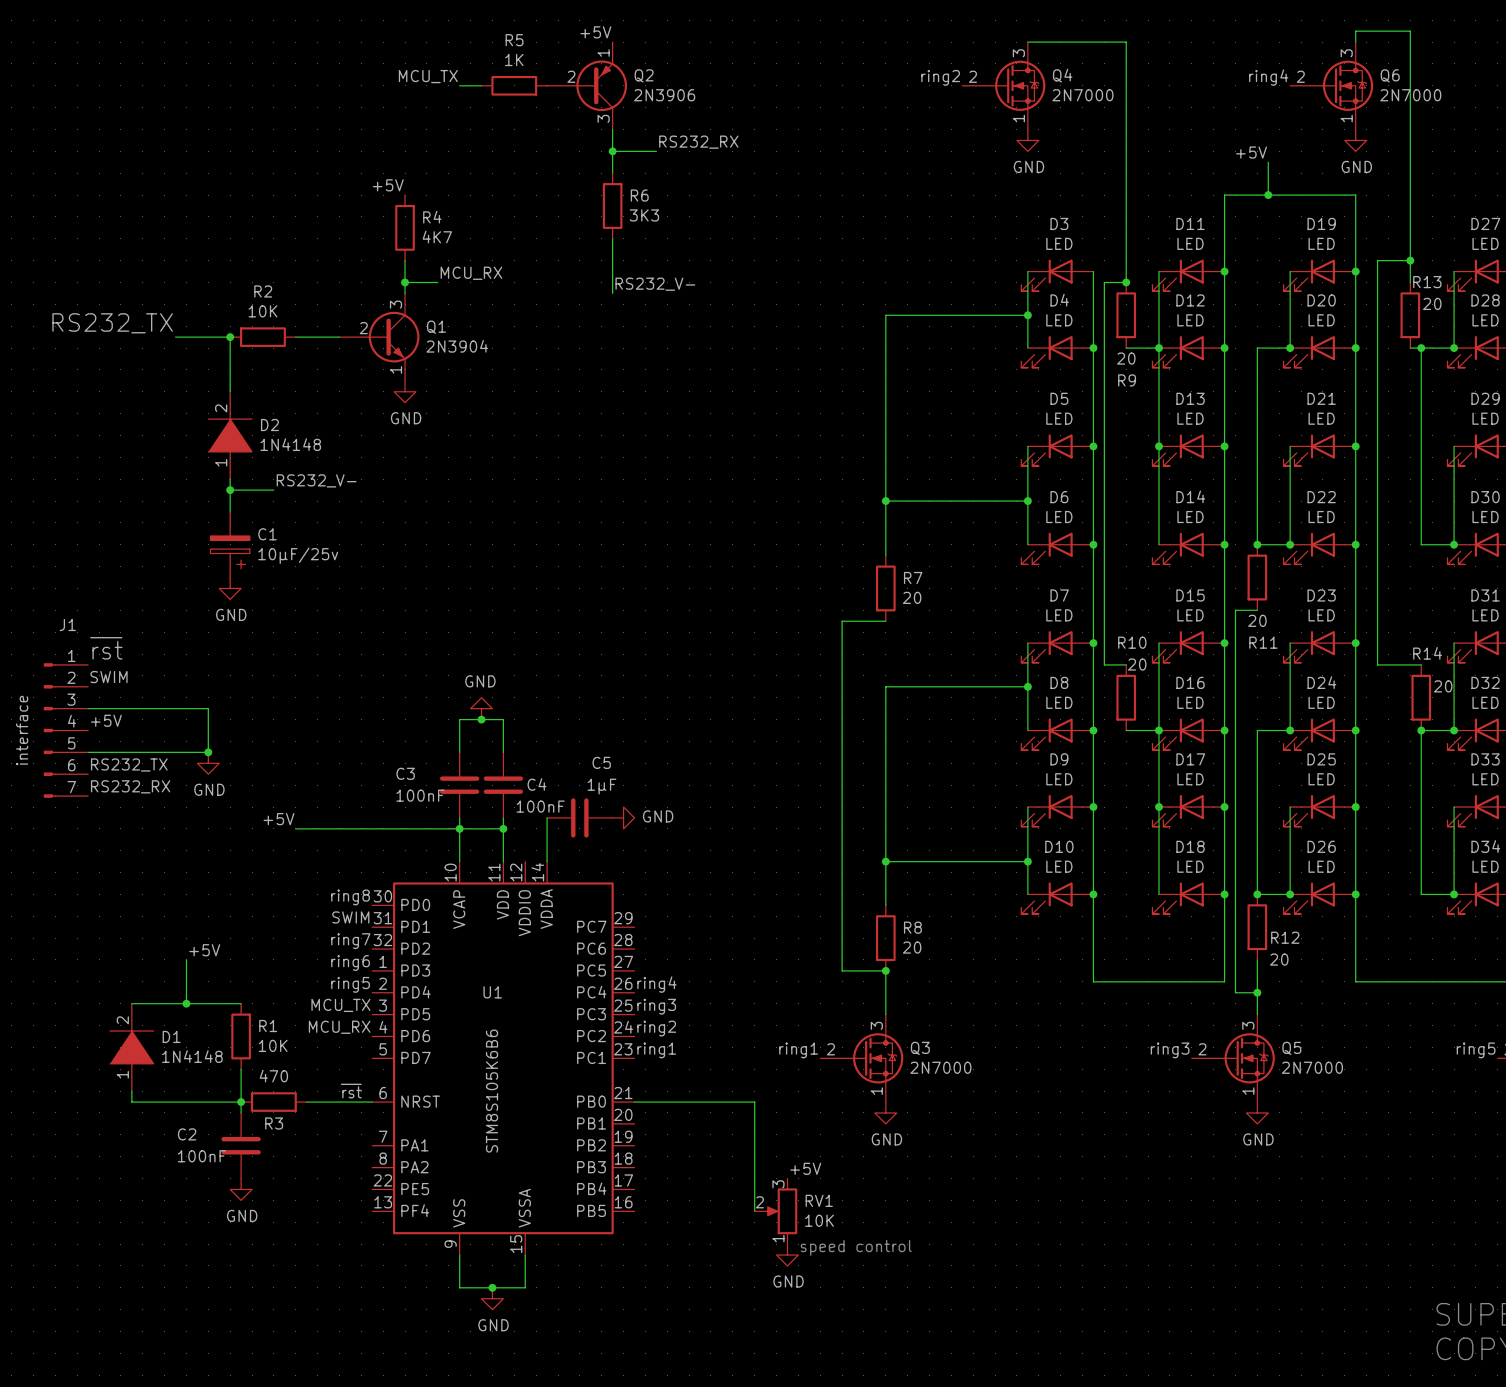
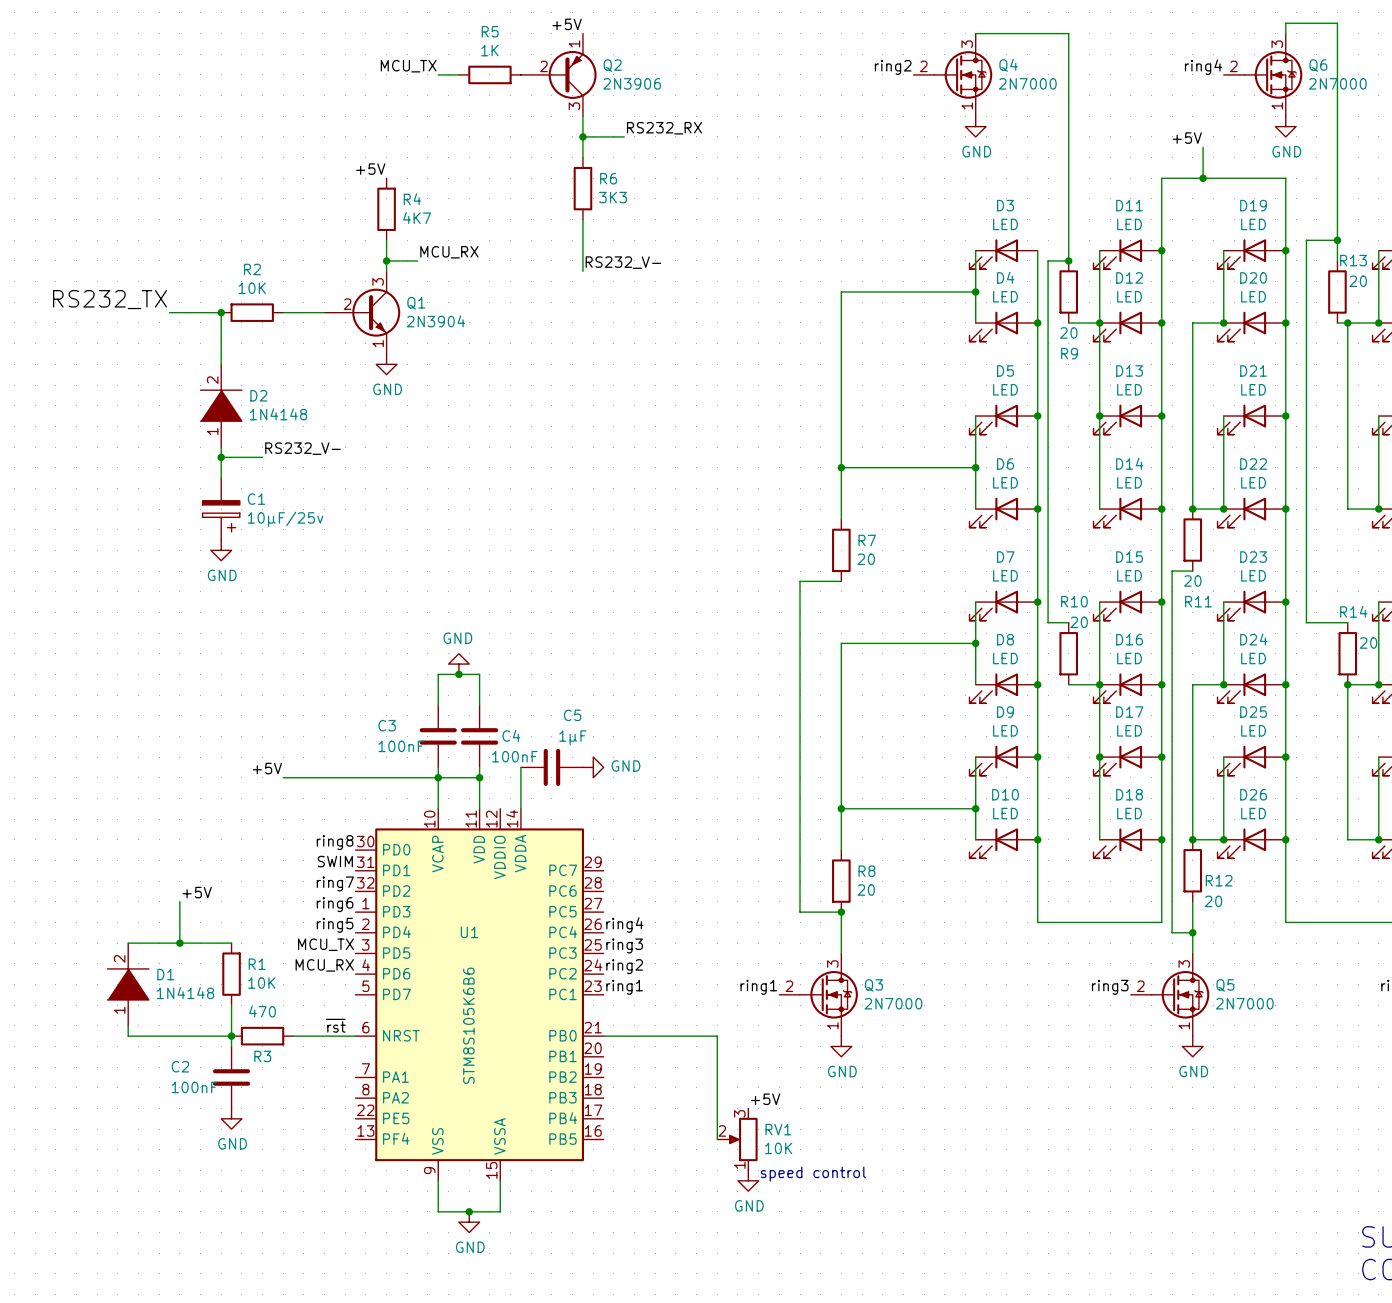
label: ~{rst} (106, 648) -> none
label: SWIM (109, 677) -> none
wire: (88, 708) (208, 708) (208, 752) (88, 752) -> none
label: +5V (106, 720) -> none
J1: interface (65, 730) -> none
junction: (208, 752) -> none
power symbol: GND (208, 763) -> none
label: RS232_TX (129, 764) -> none
label: RS232_RX (130, 786) -> none

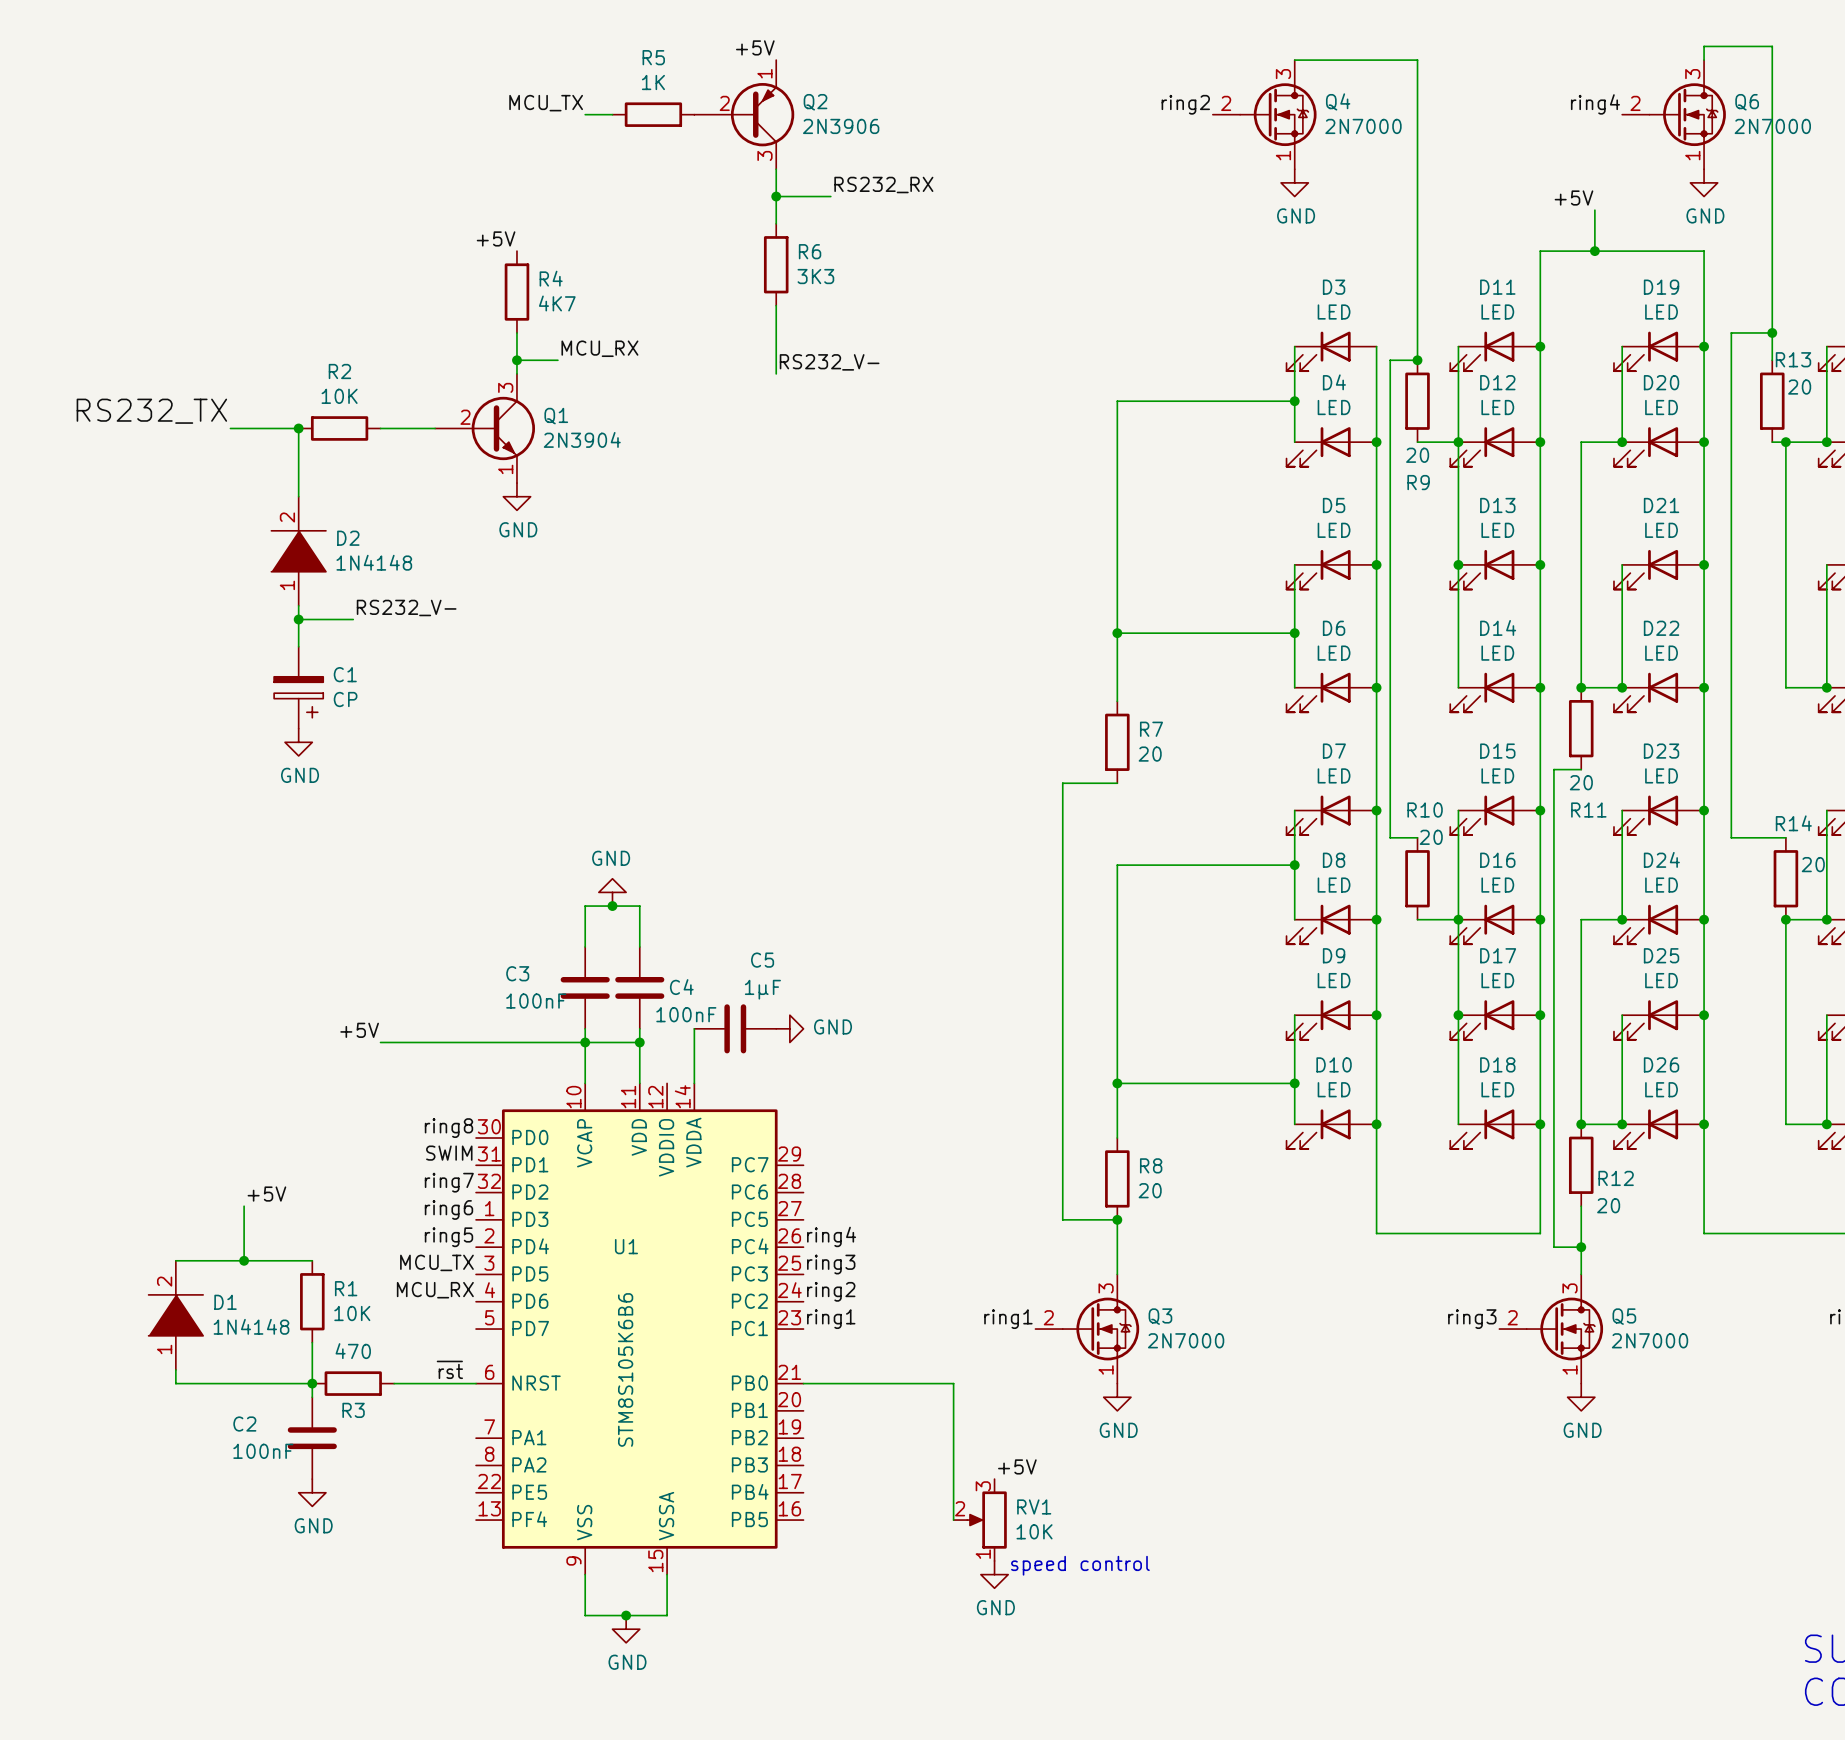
C1 value: 10µF/25v (285, 519) -> CP (345, 699)

